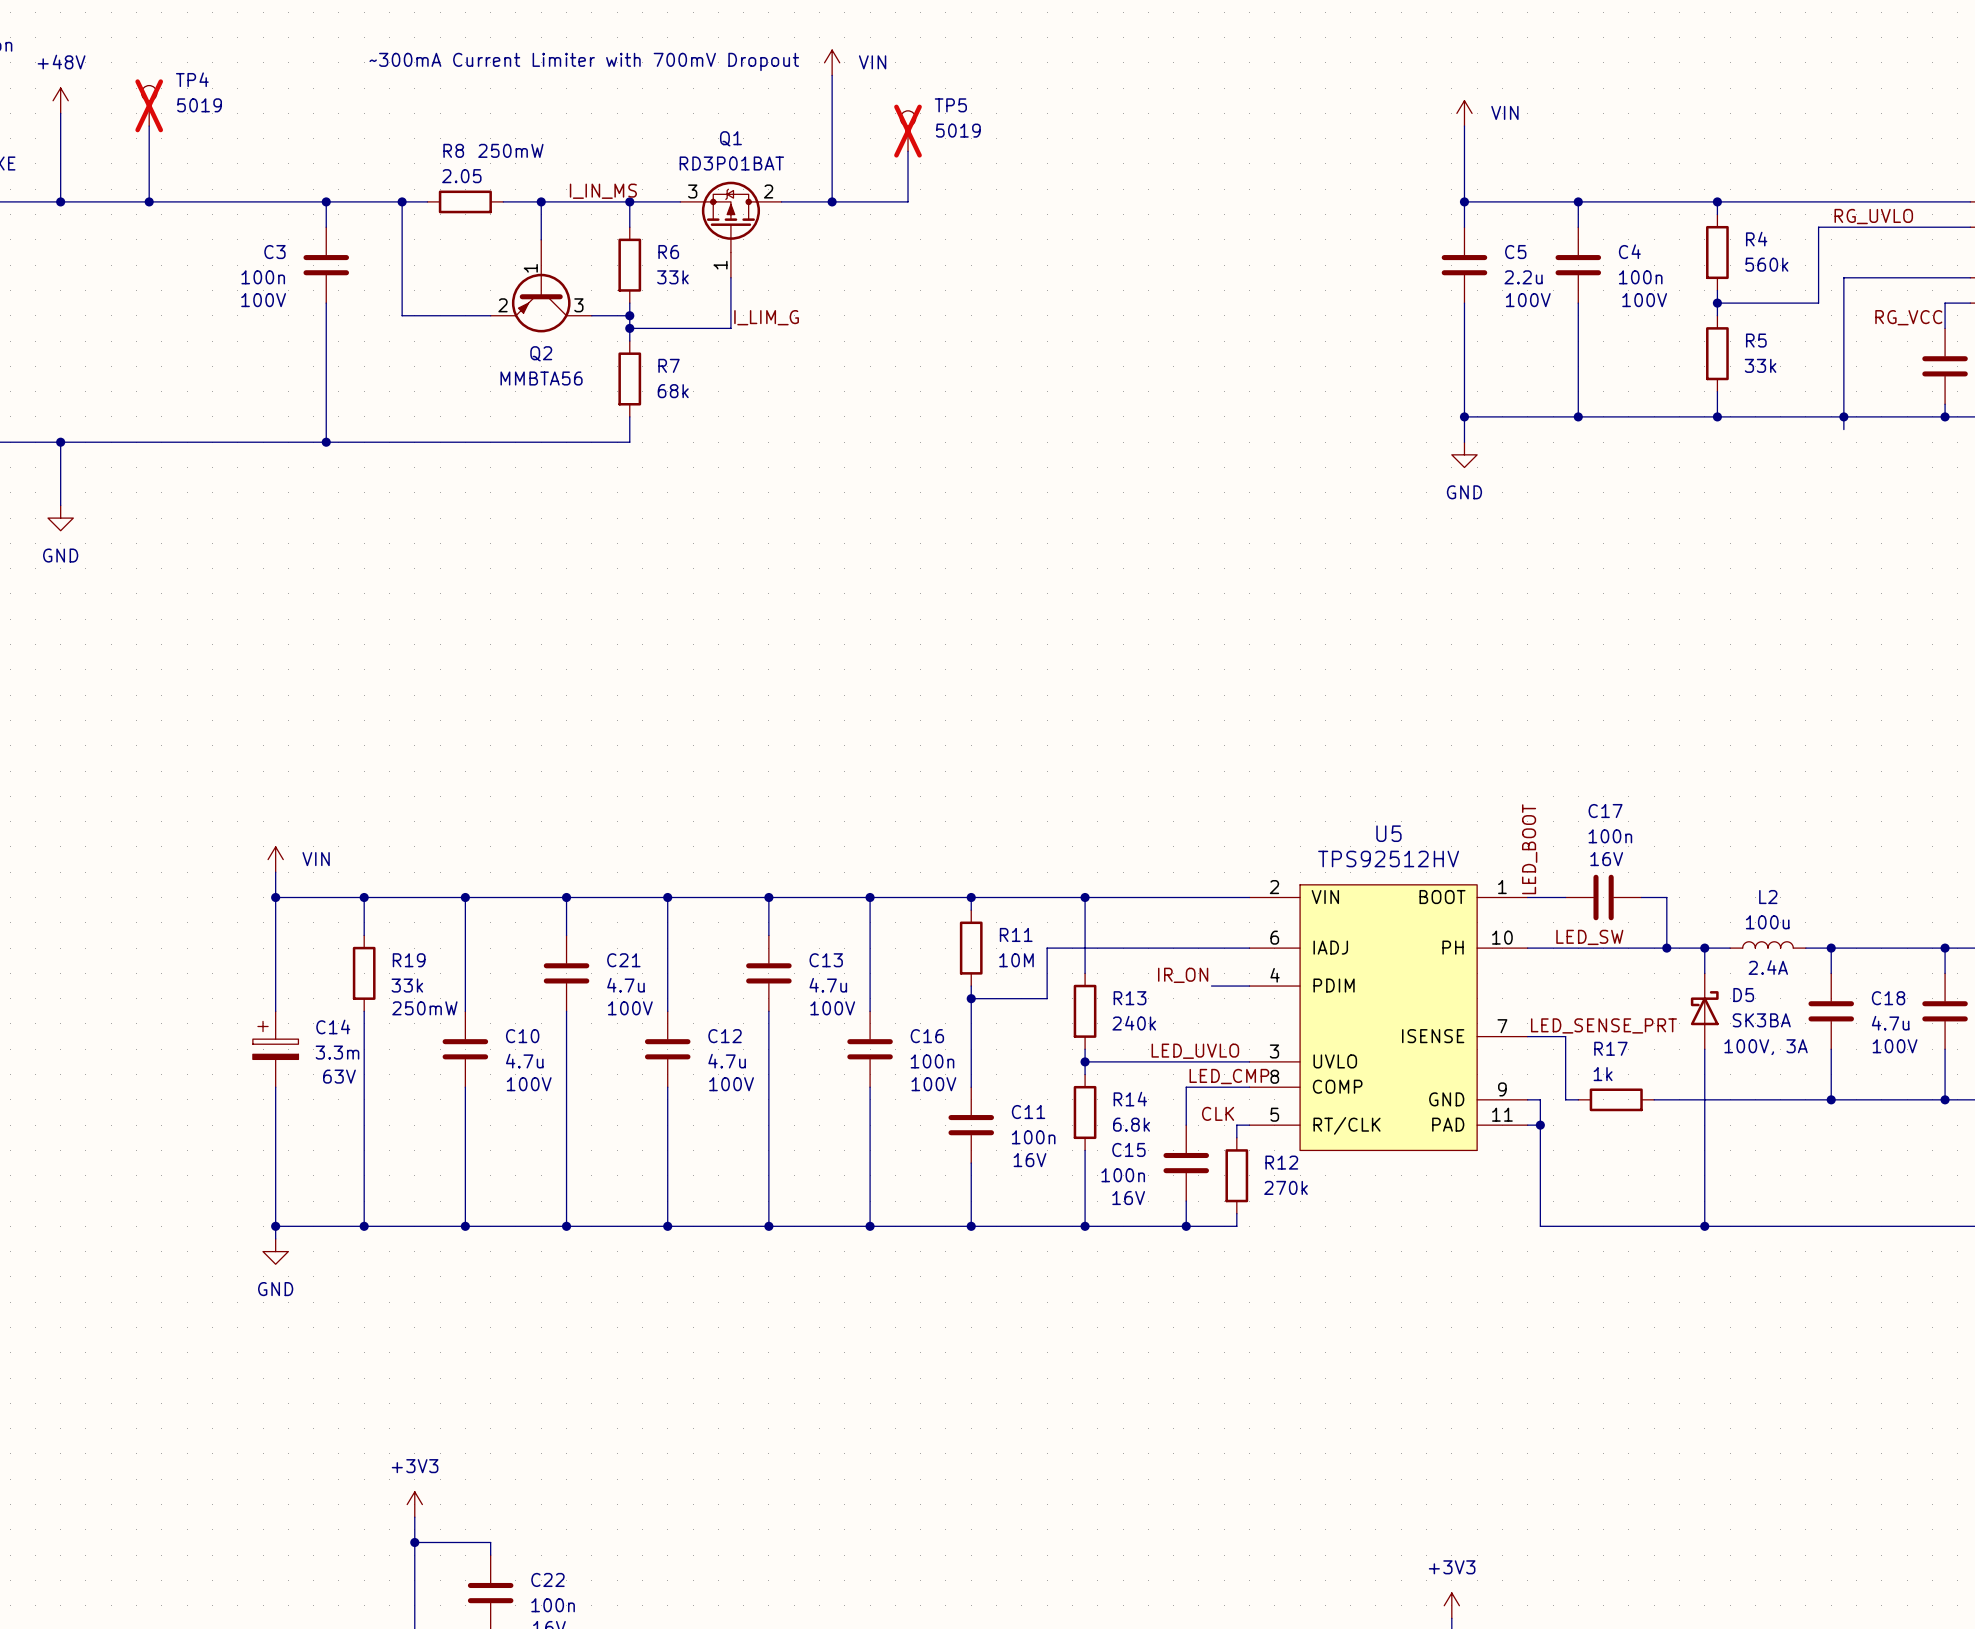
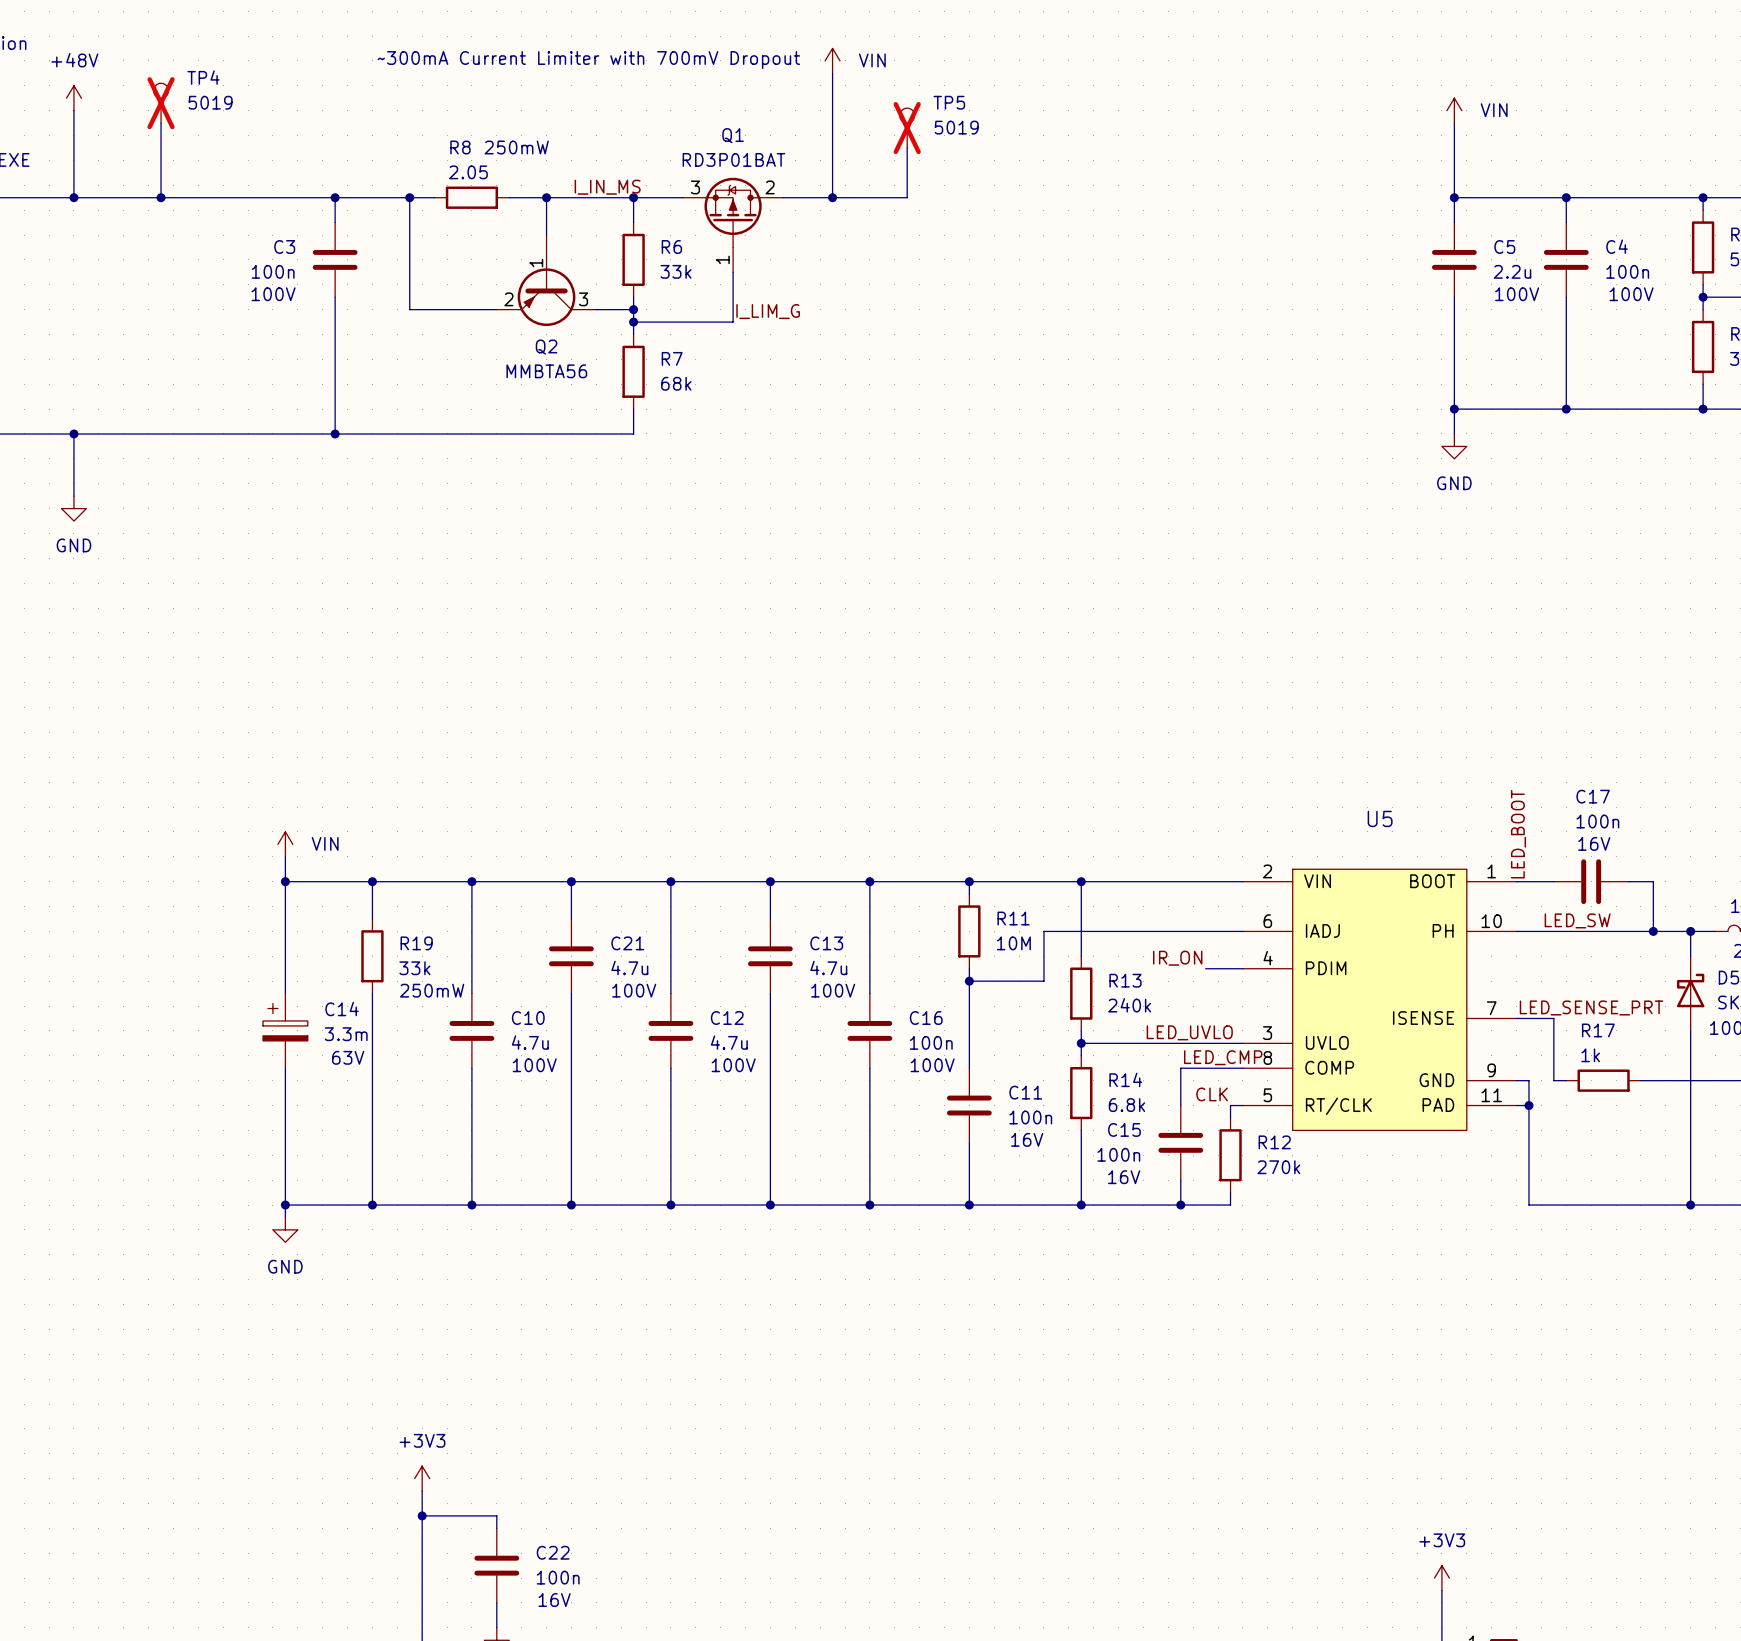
U5 value: TPS92512HV (1388, 858) -> none

